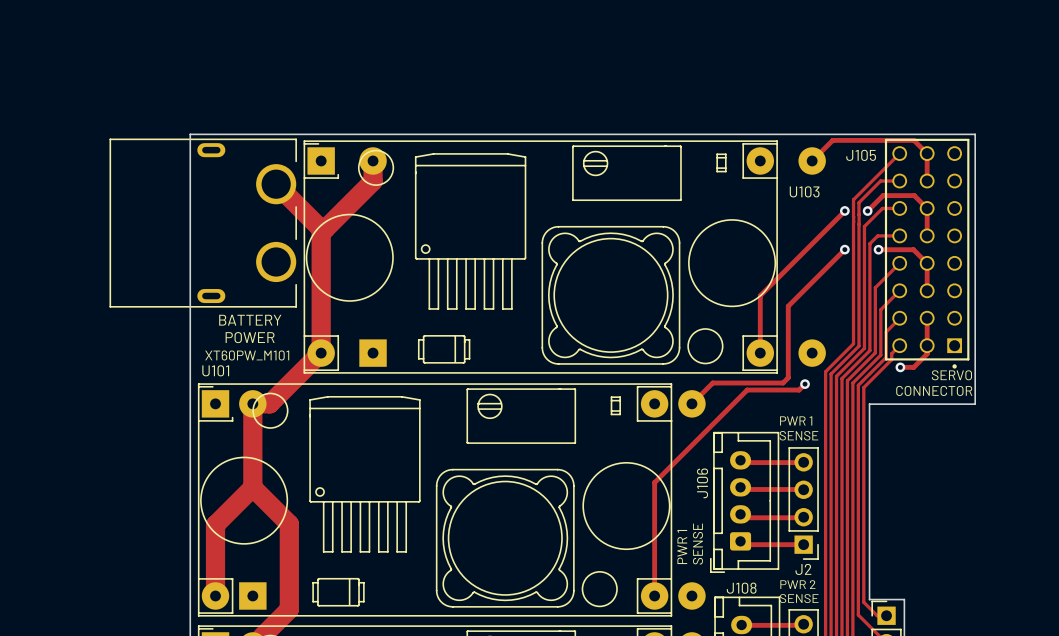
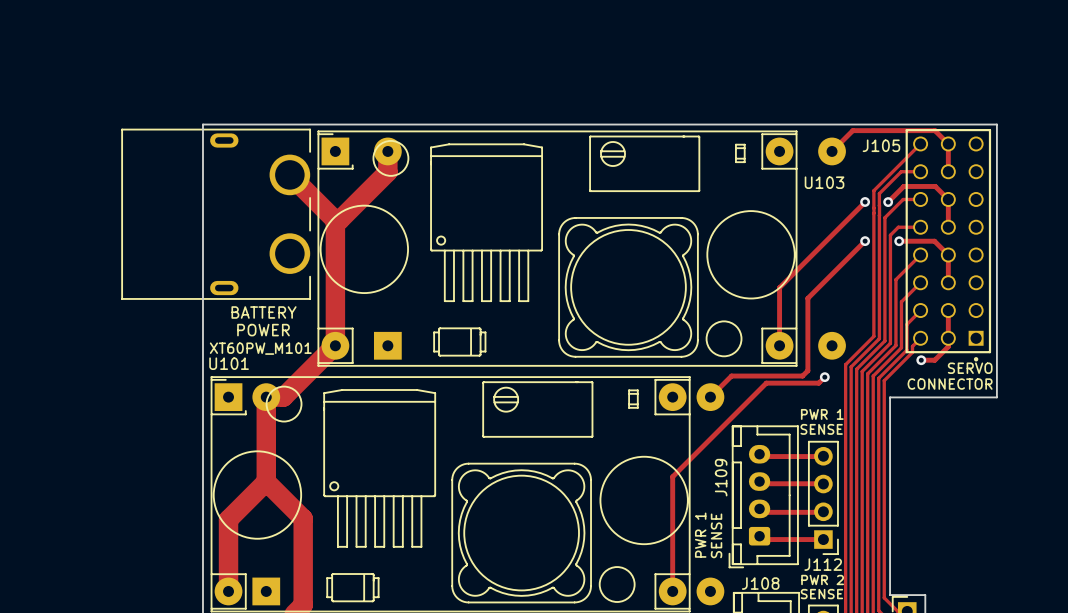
J106 name: J106 (702, 483) -> J109 (721, 477)
J2 name: J2 (803, 569) -> J112 (823, 564)

